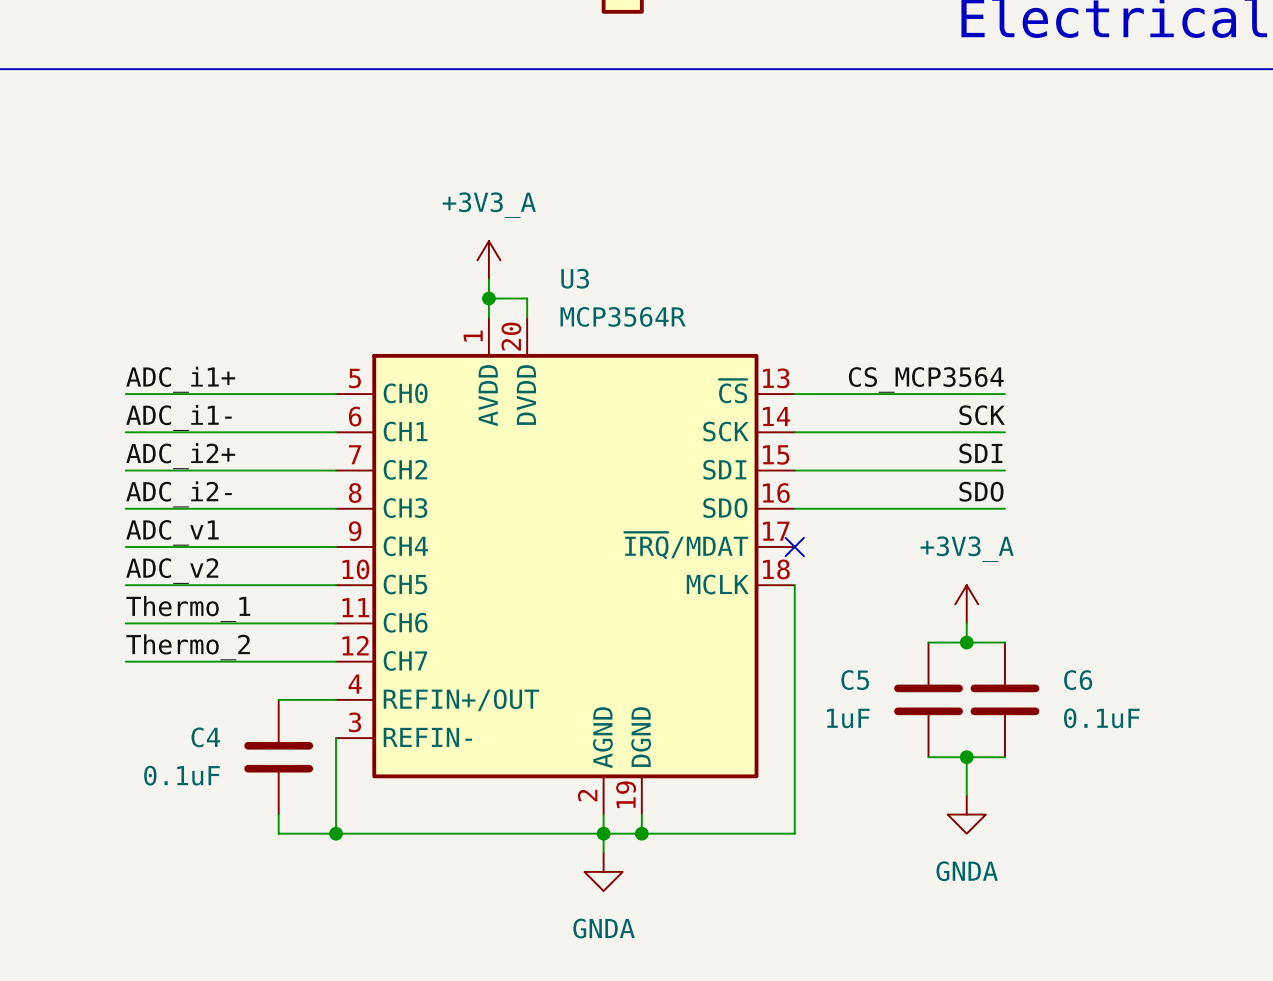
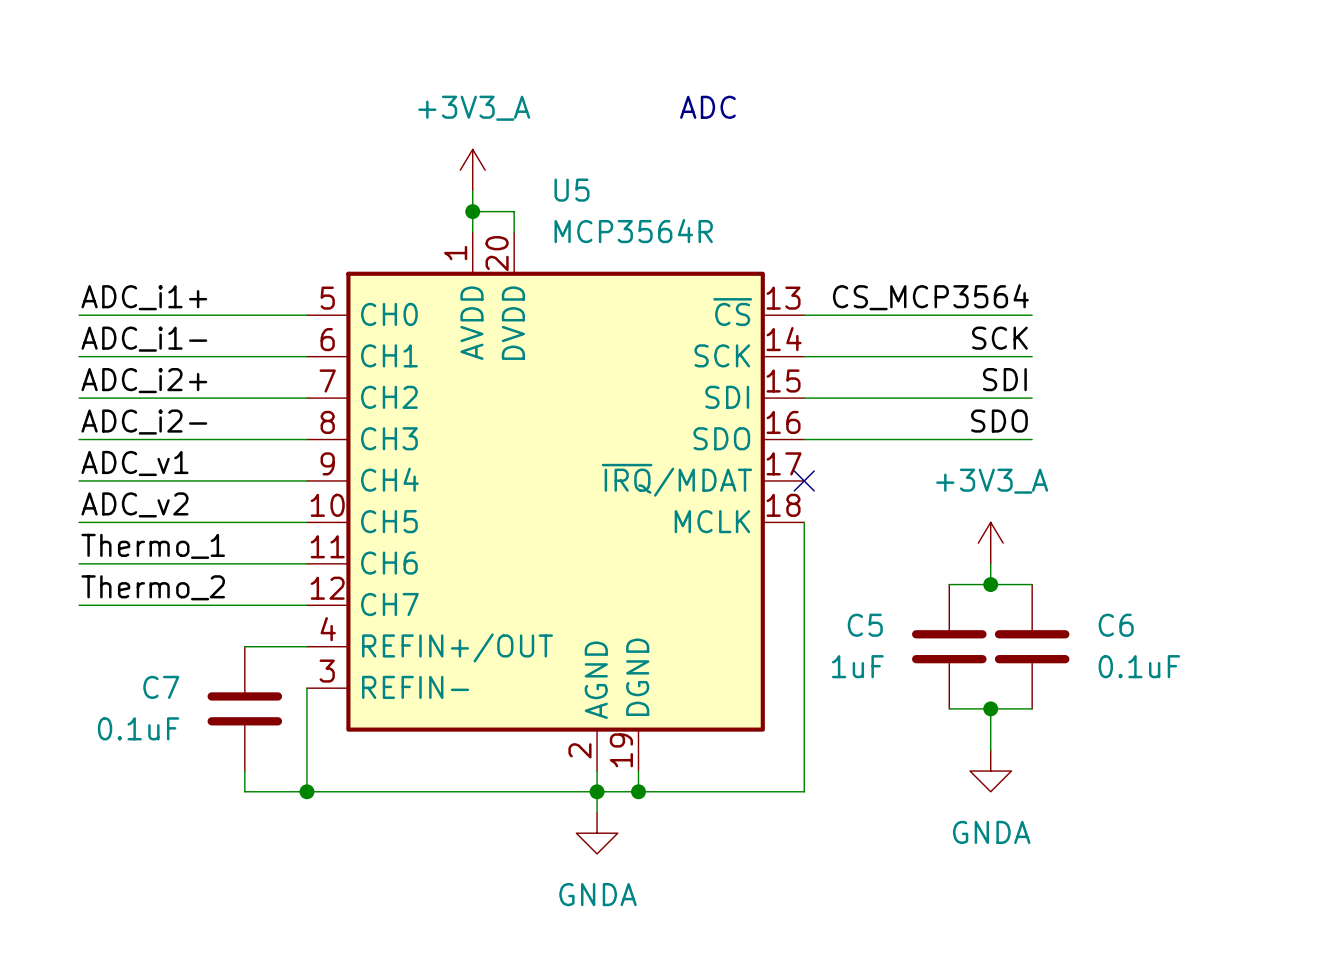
text: none -> ADC (707, 107)
U3 name: U3 (575, 278) -> U5 (571, 190)
C4 name: C4 (205, 737) -> C7 (161, 687)

